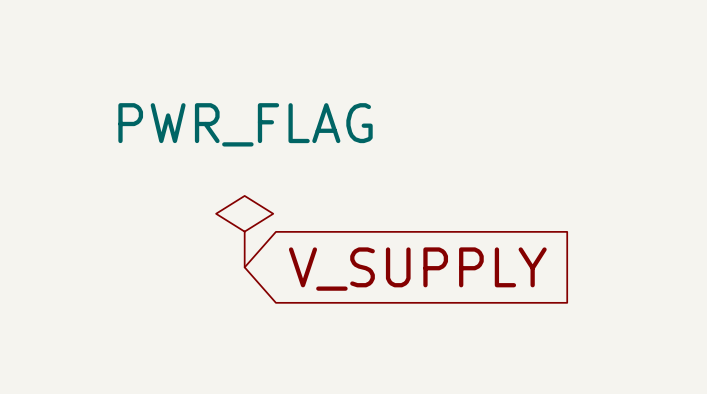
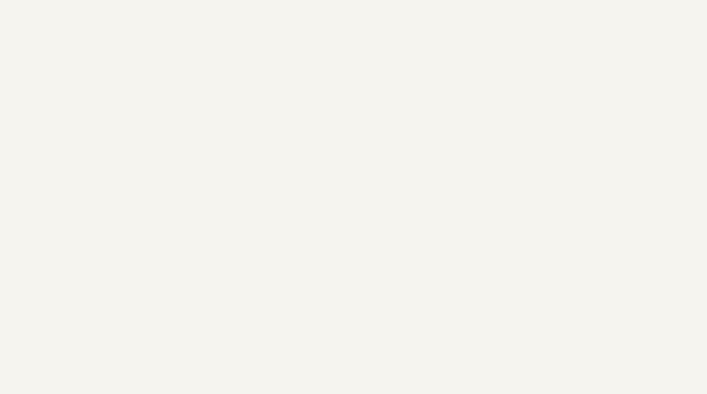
power symbol: PWR_FLAG (244, 231) -> none
global label: V_SUPPLY (417, 269) -> none

